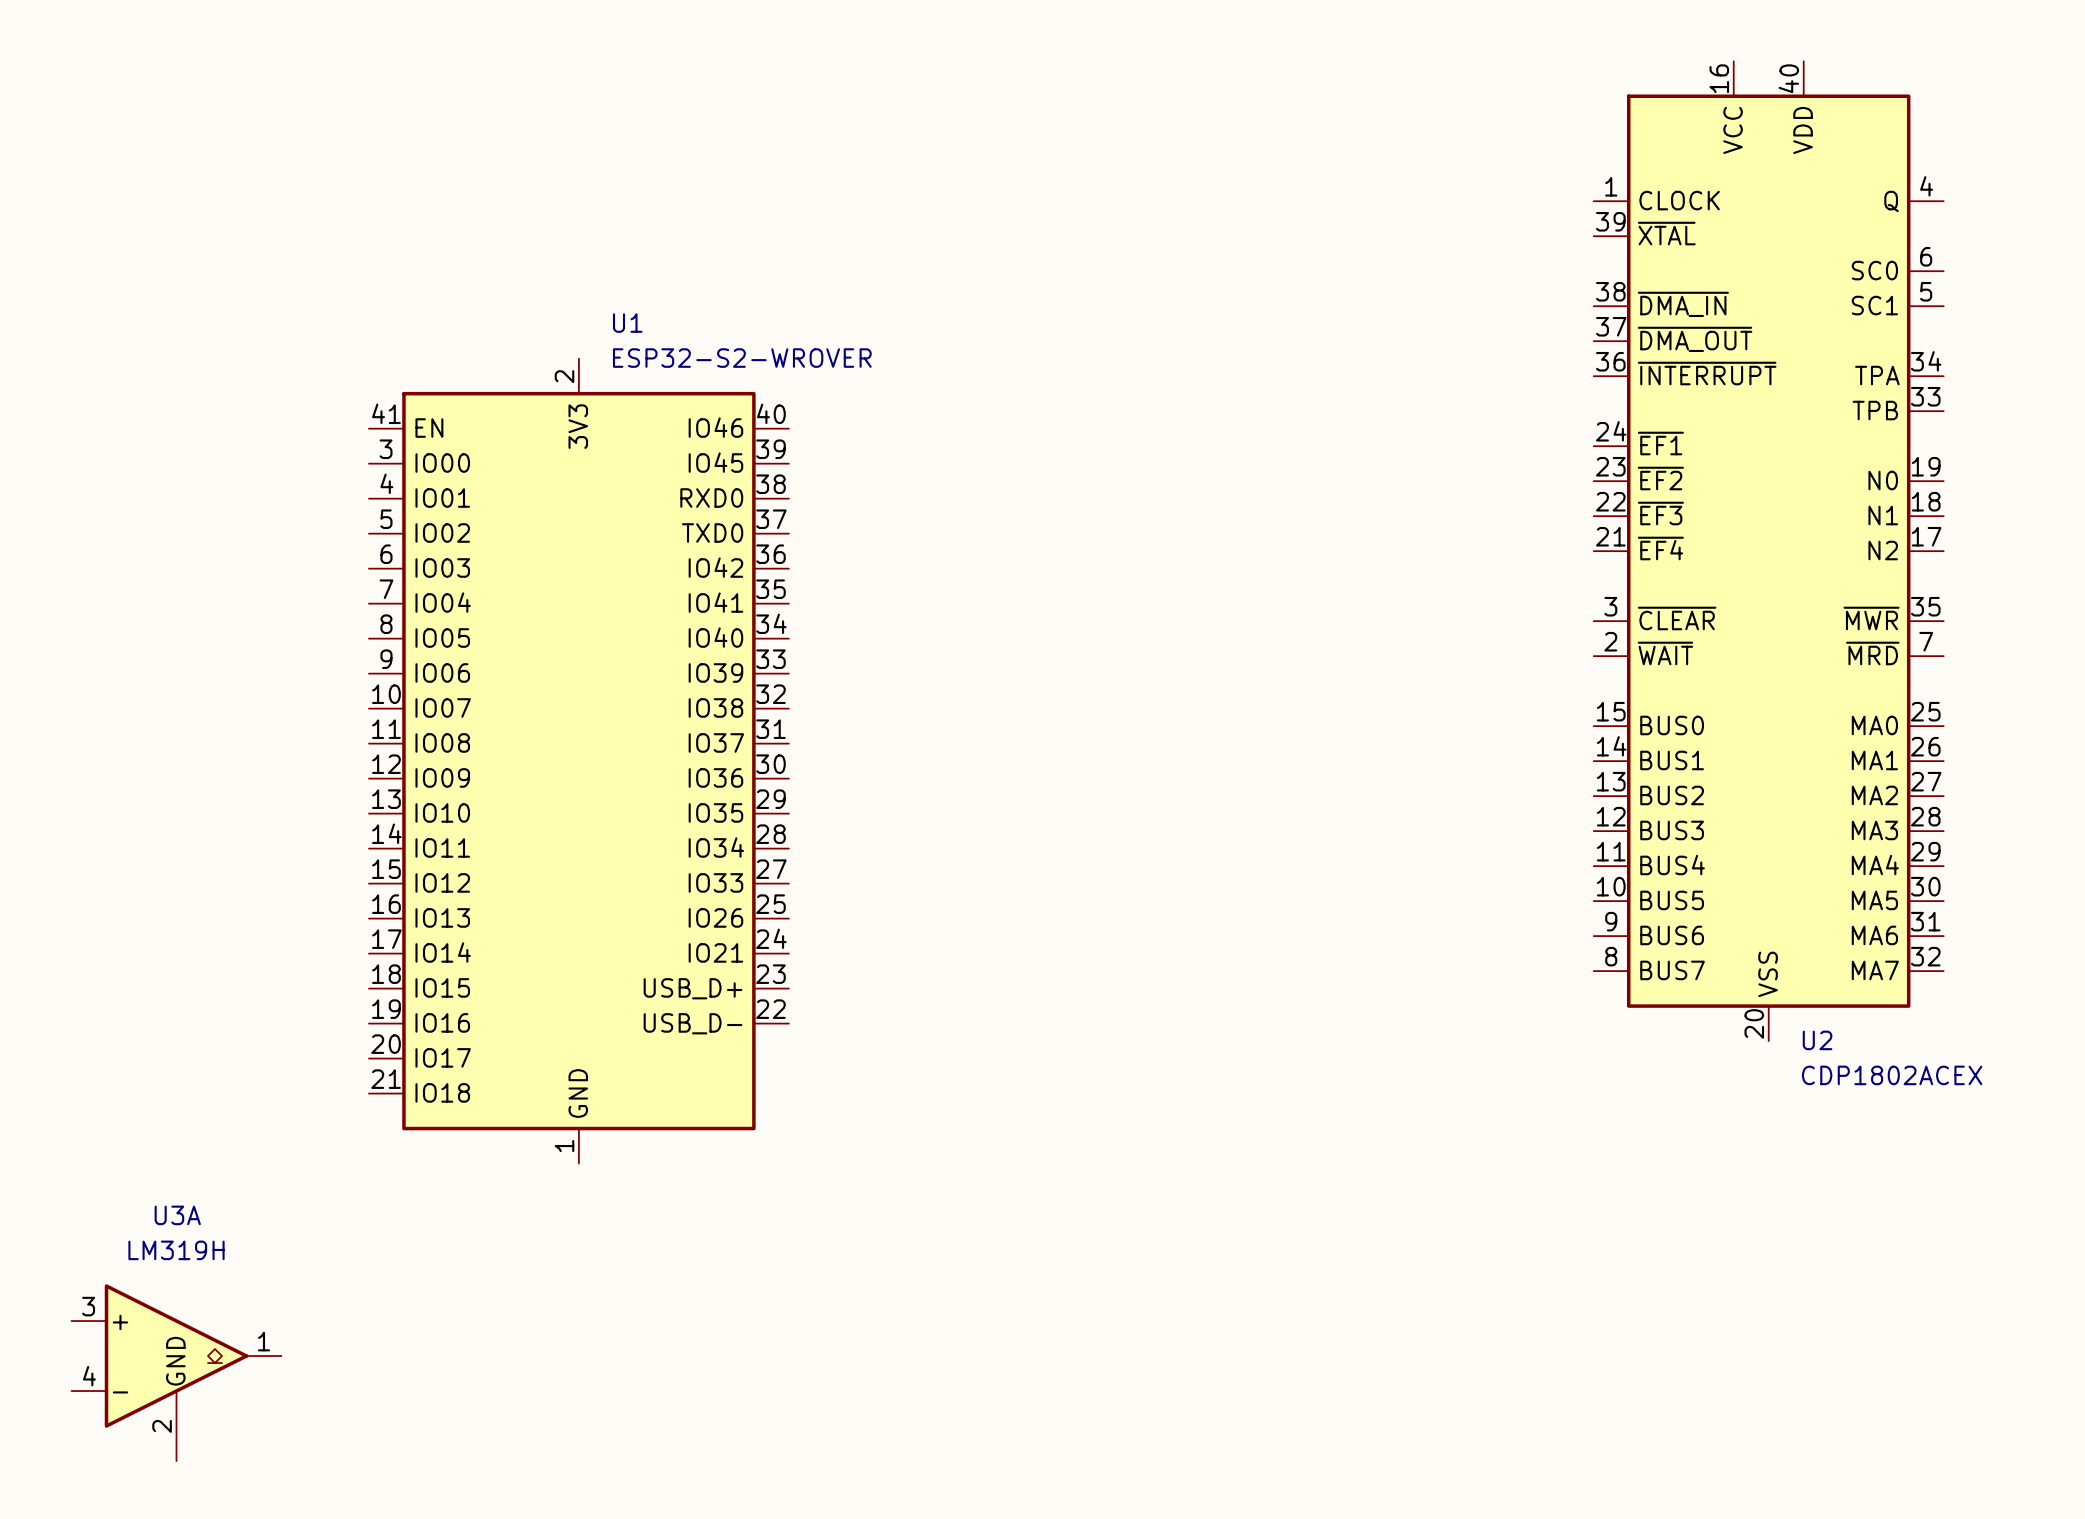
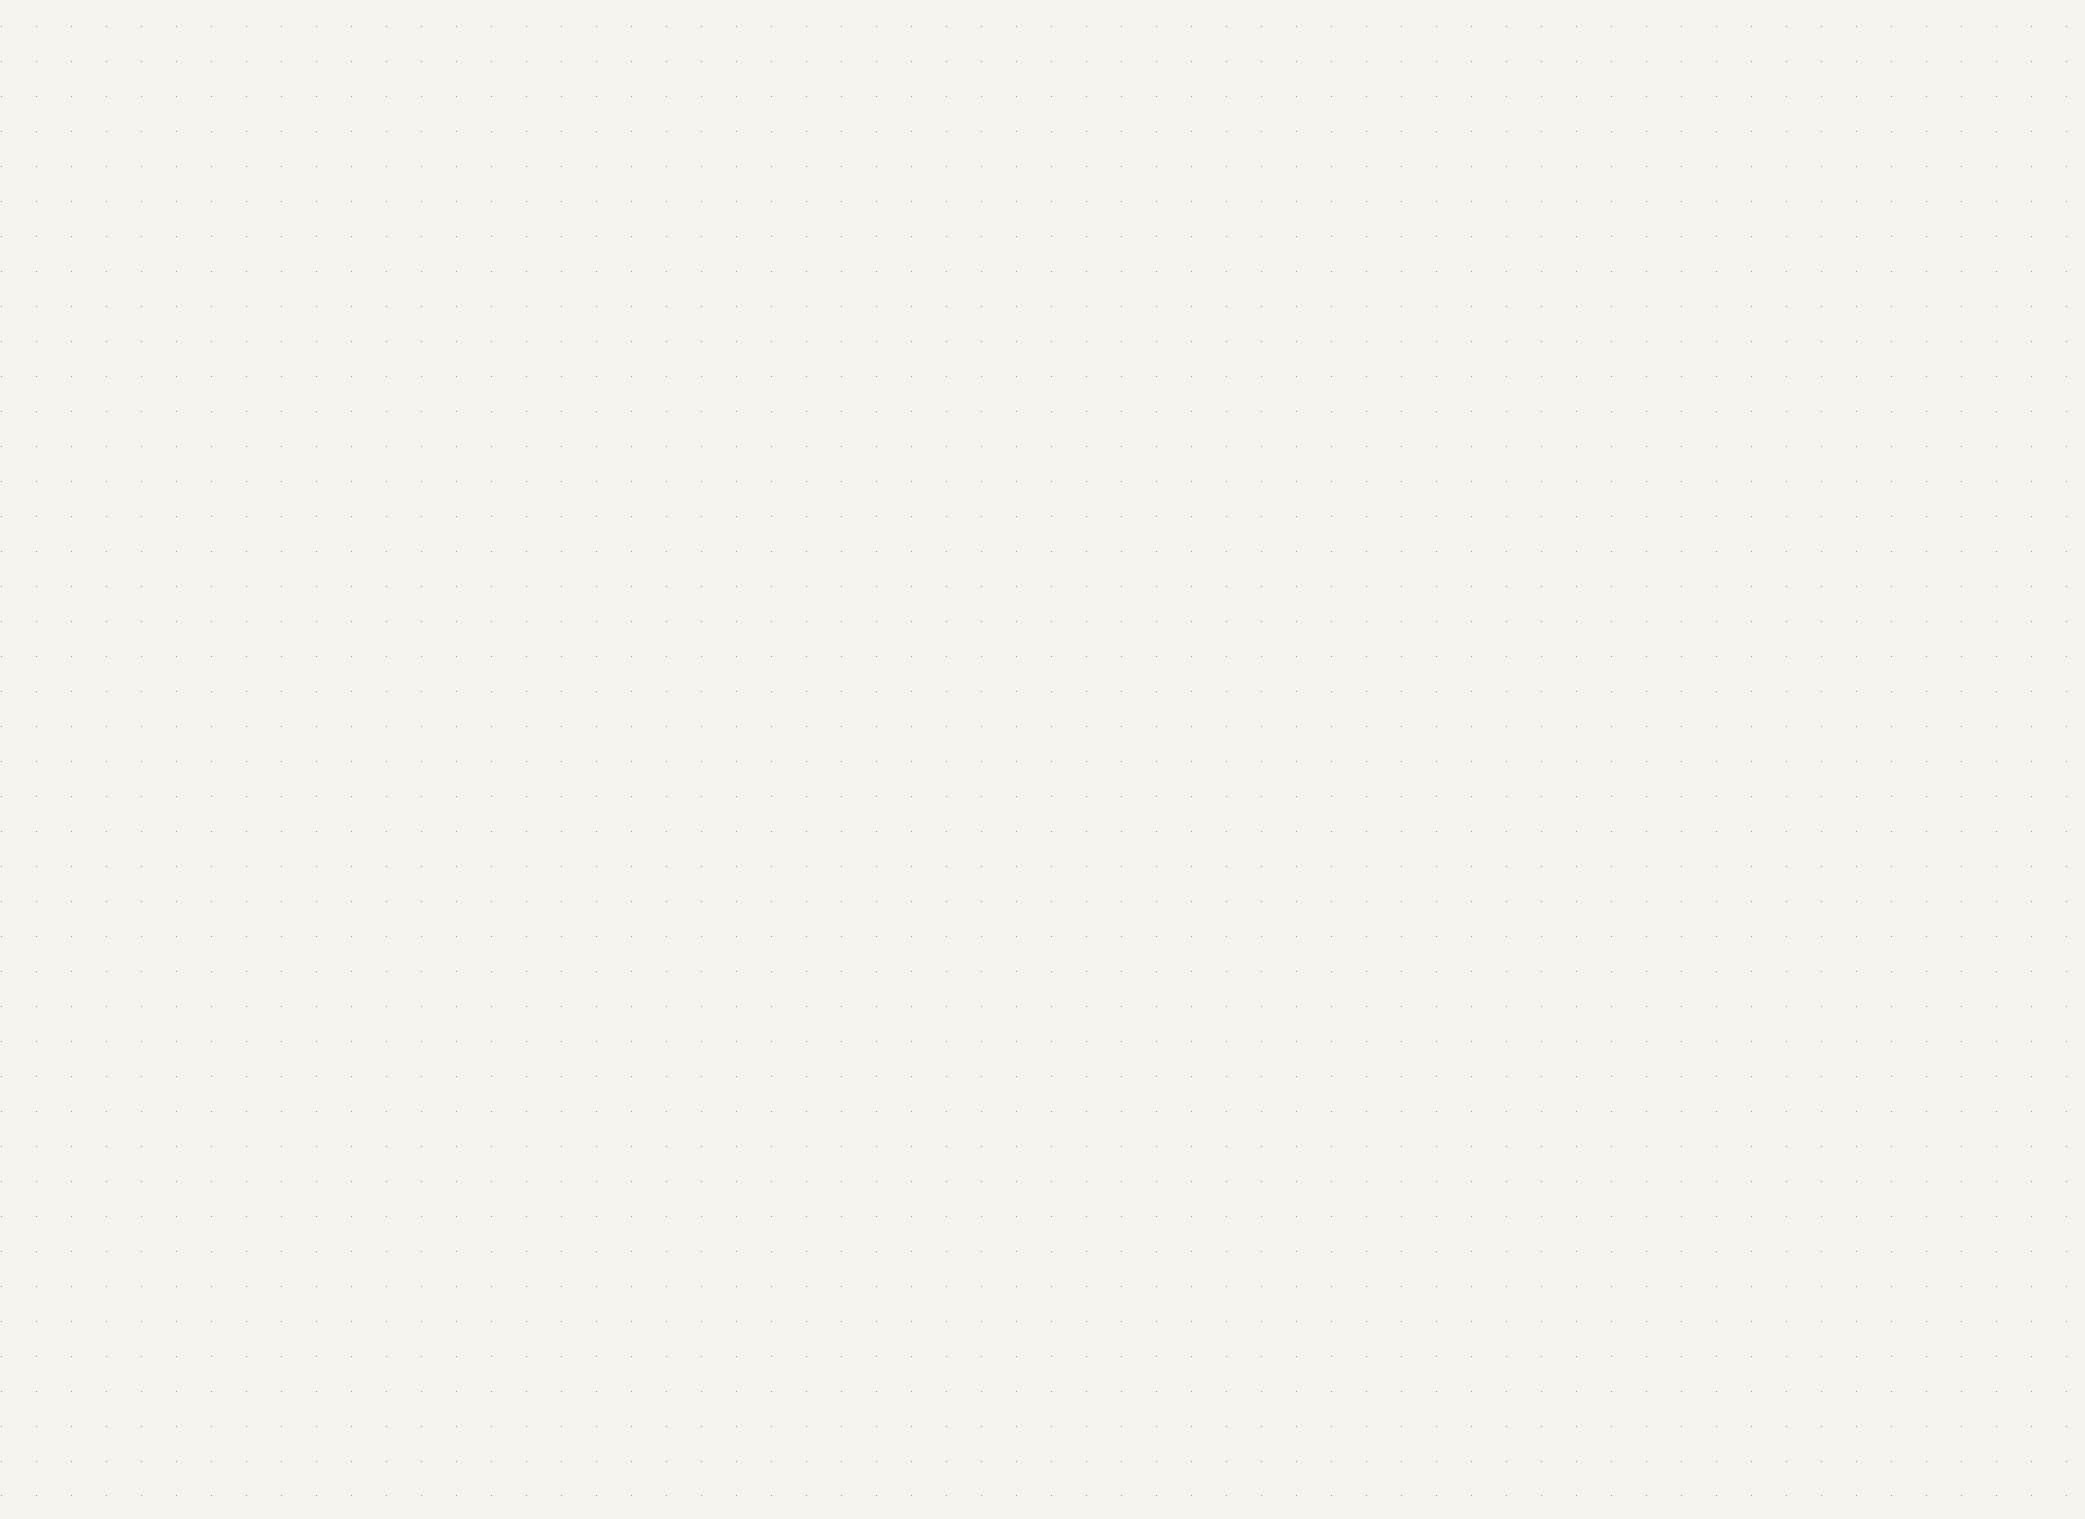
U2: CDP1802ACEX (1768, 551) -> none
U1: ESP32-S2-WROVER (578, 761) -> none
U3A: LM319H (176, 1372) -> none

